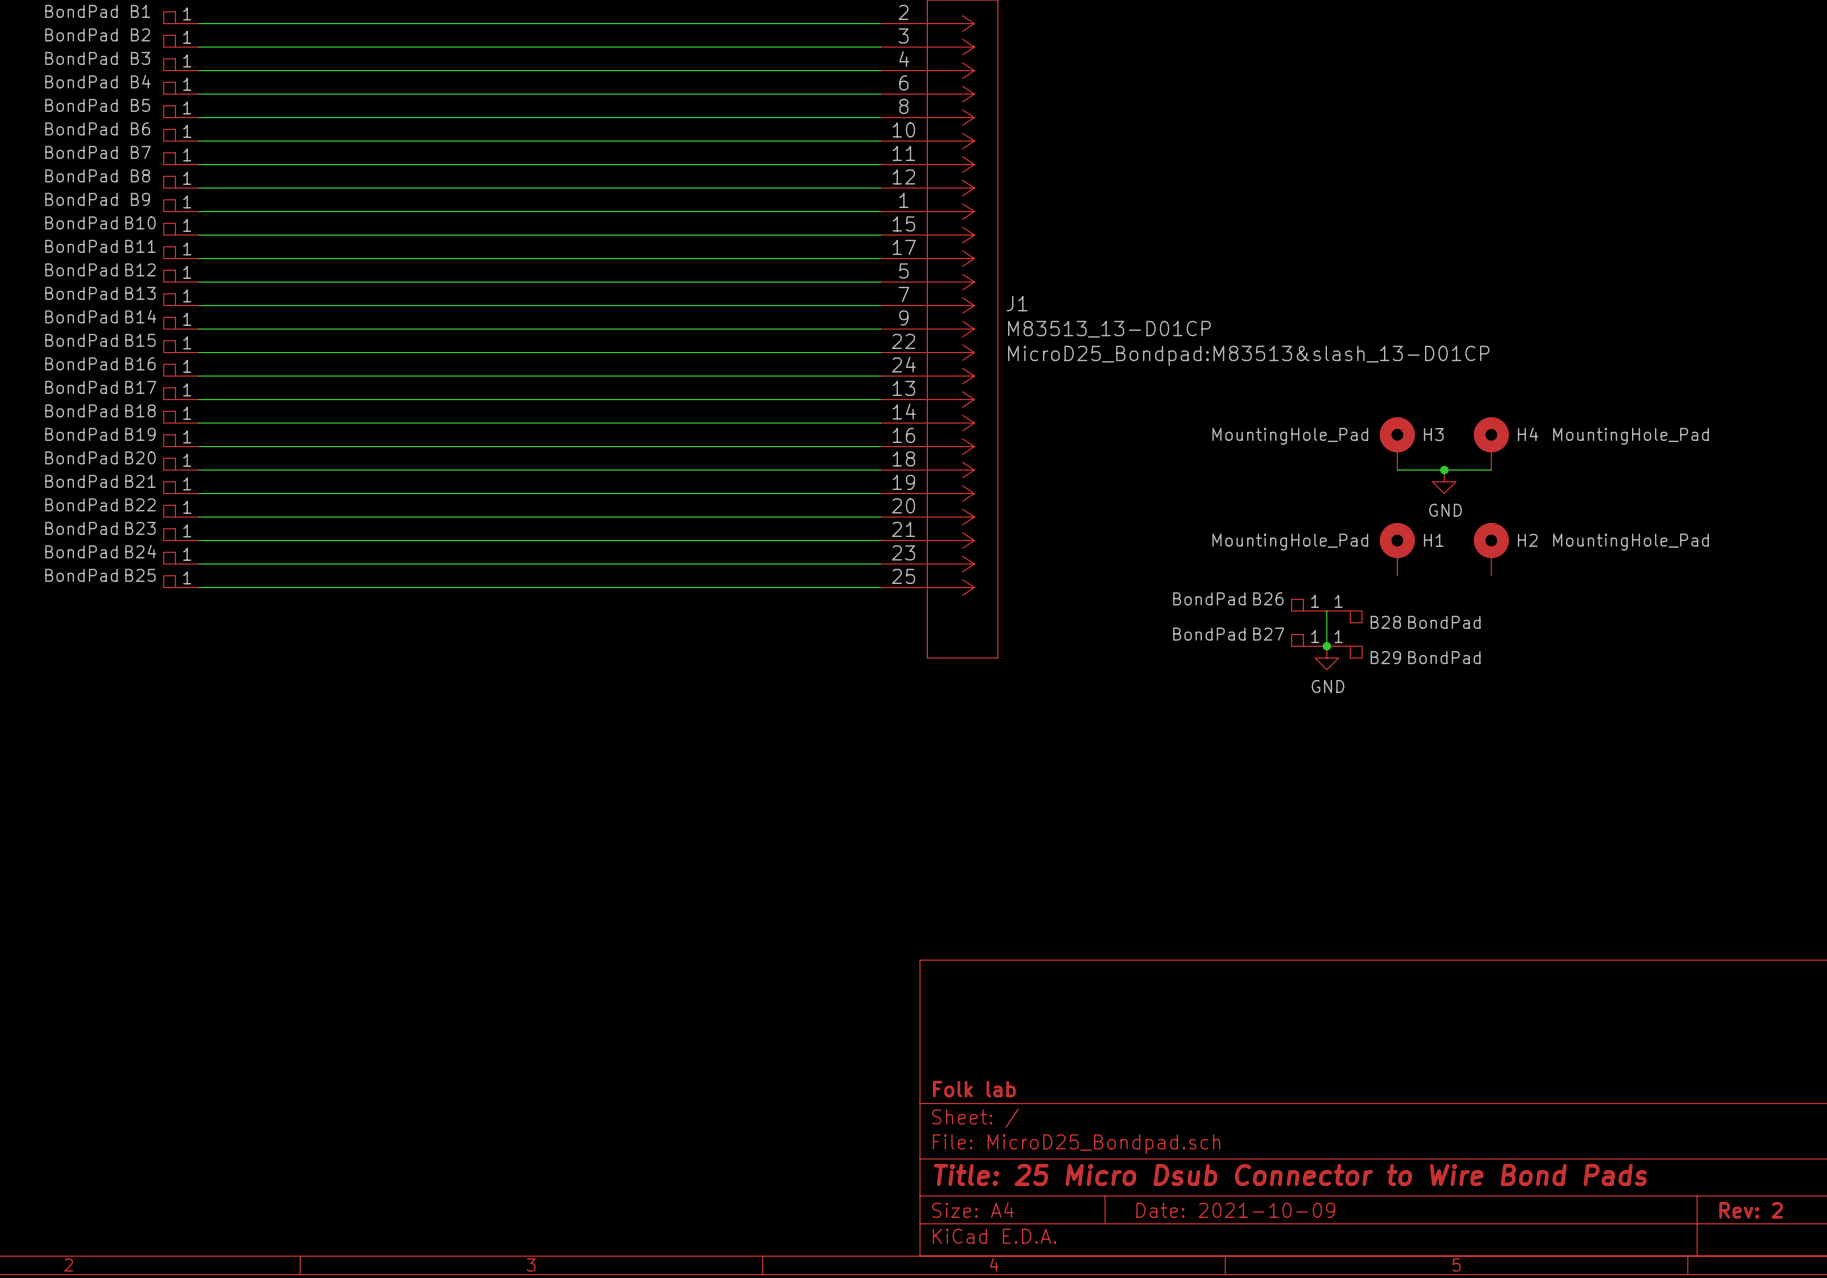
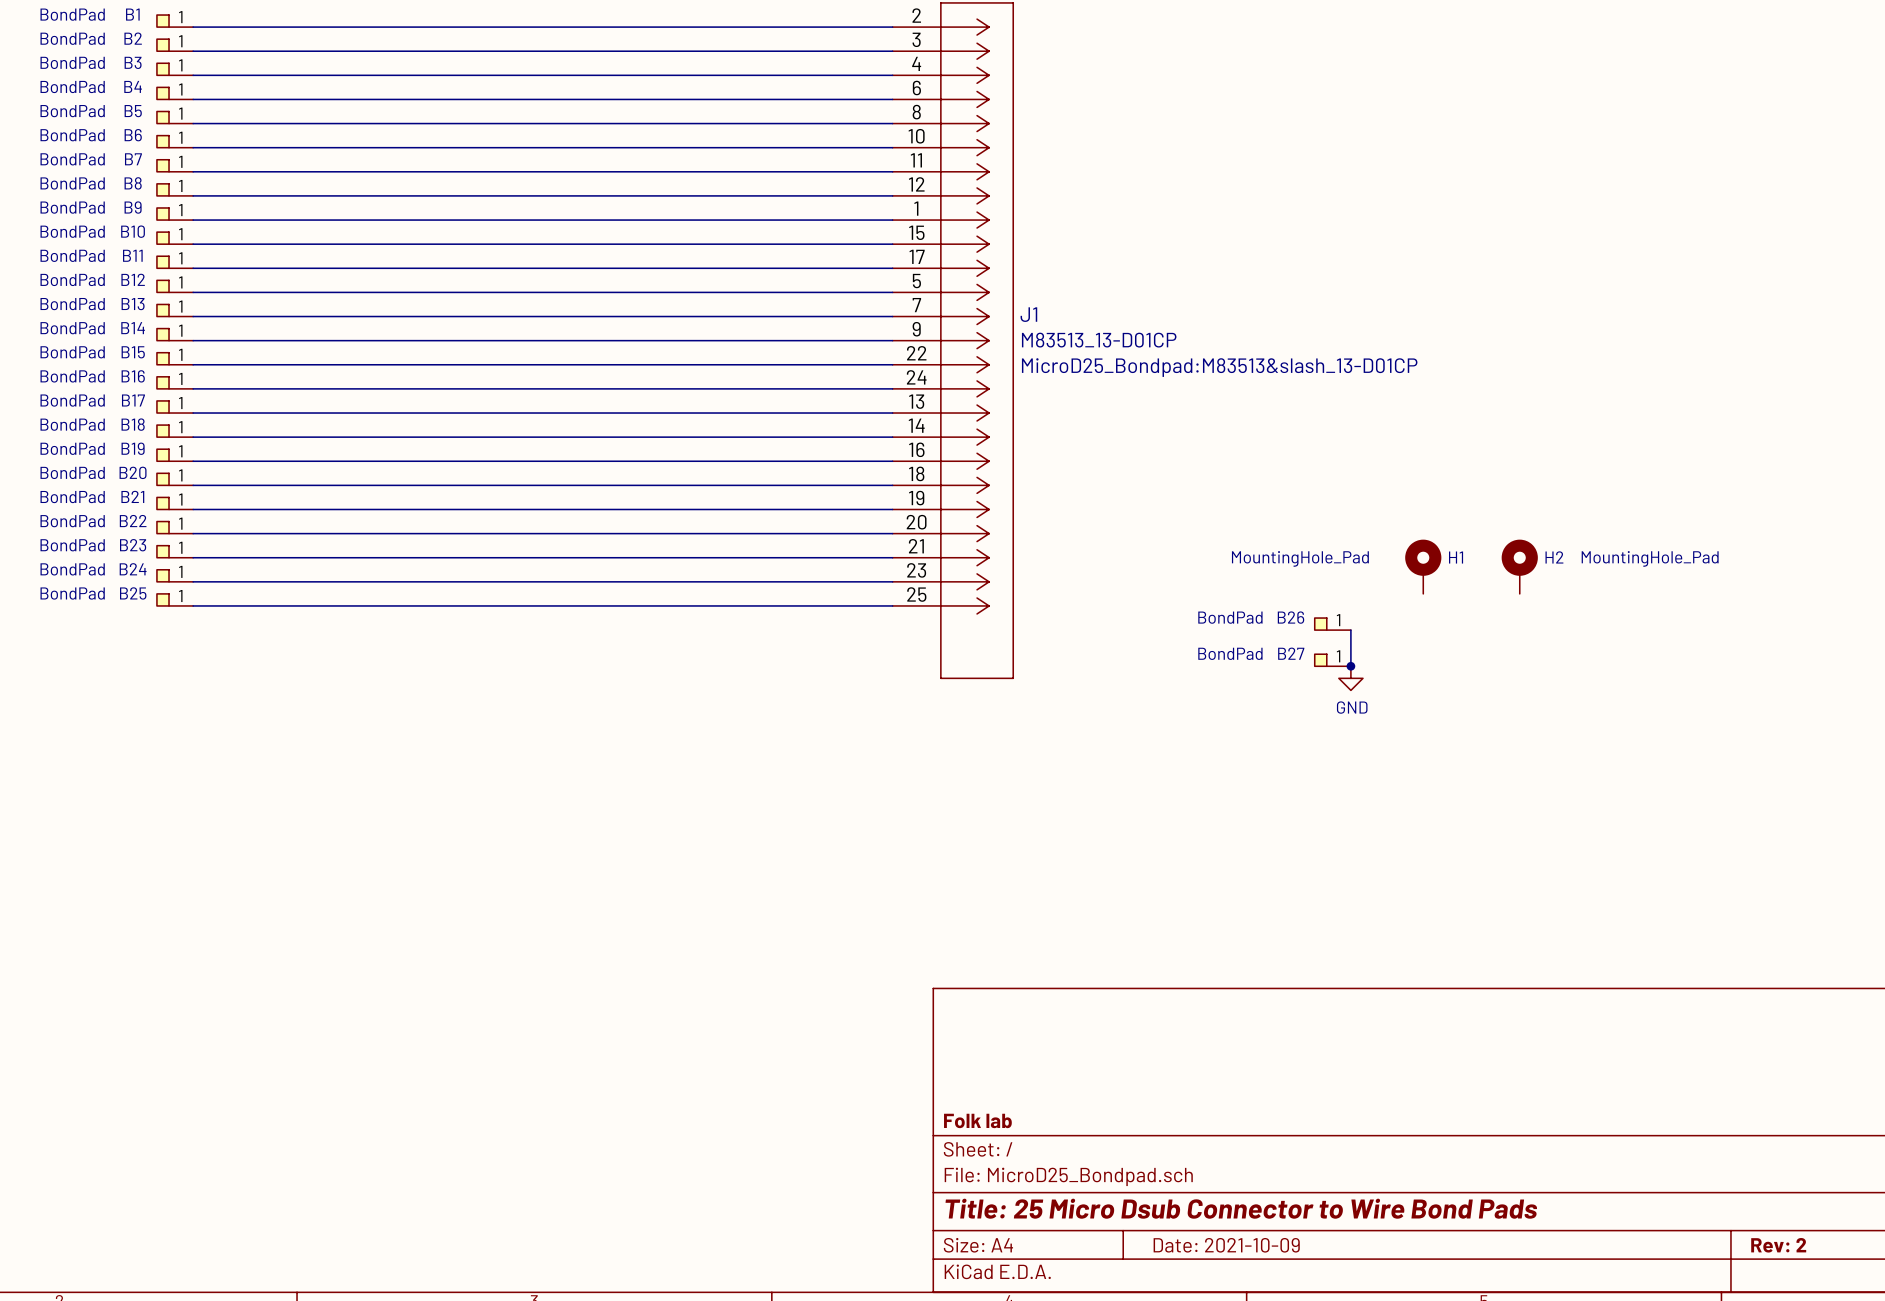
H3: MountingHole_Pad (1397, 443) -> none
H4: MountingHole_Pad (1491, 443) -> none
wire: (1397, 470) (1491, 470) -> none
junction: (1444, 470) -> none
power symbol: GND (1444, 481) -> none
B28: BondPad (1344, 616) -> none
B29: BondPad (1344, 652) -> none

